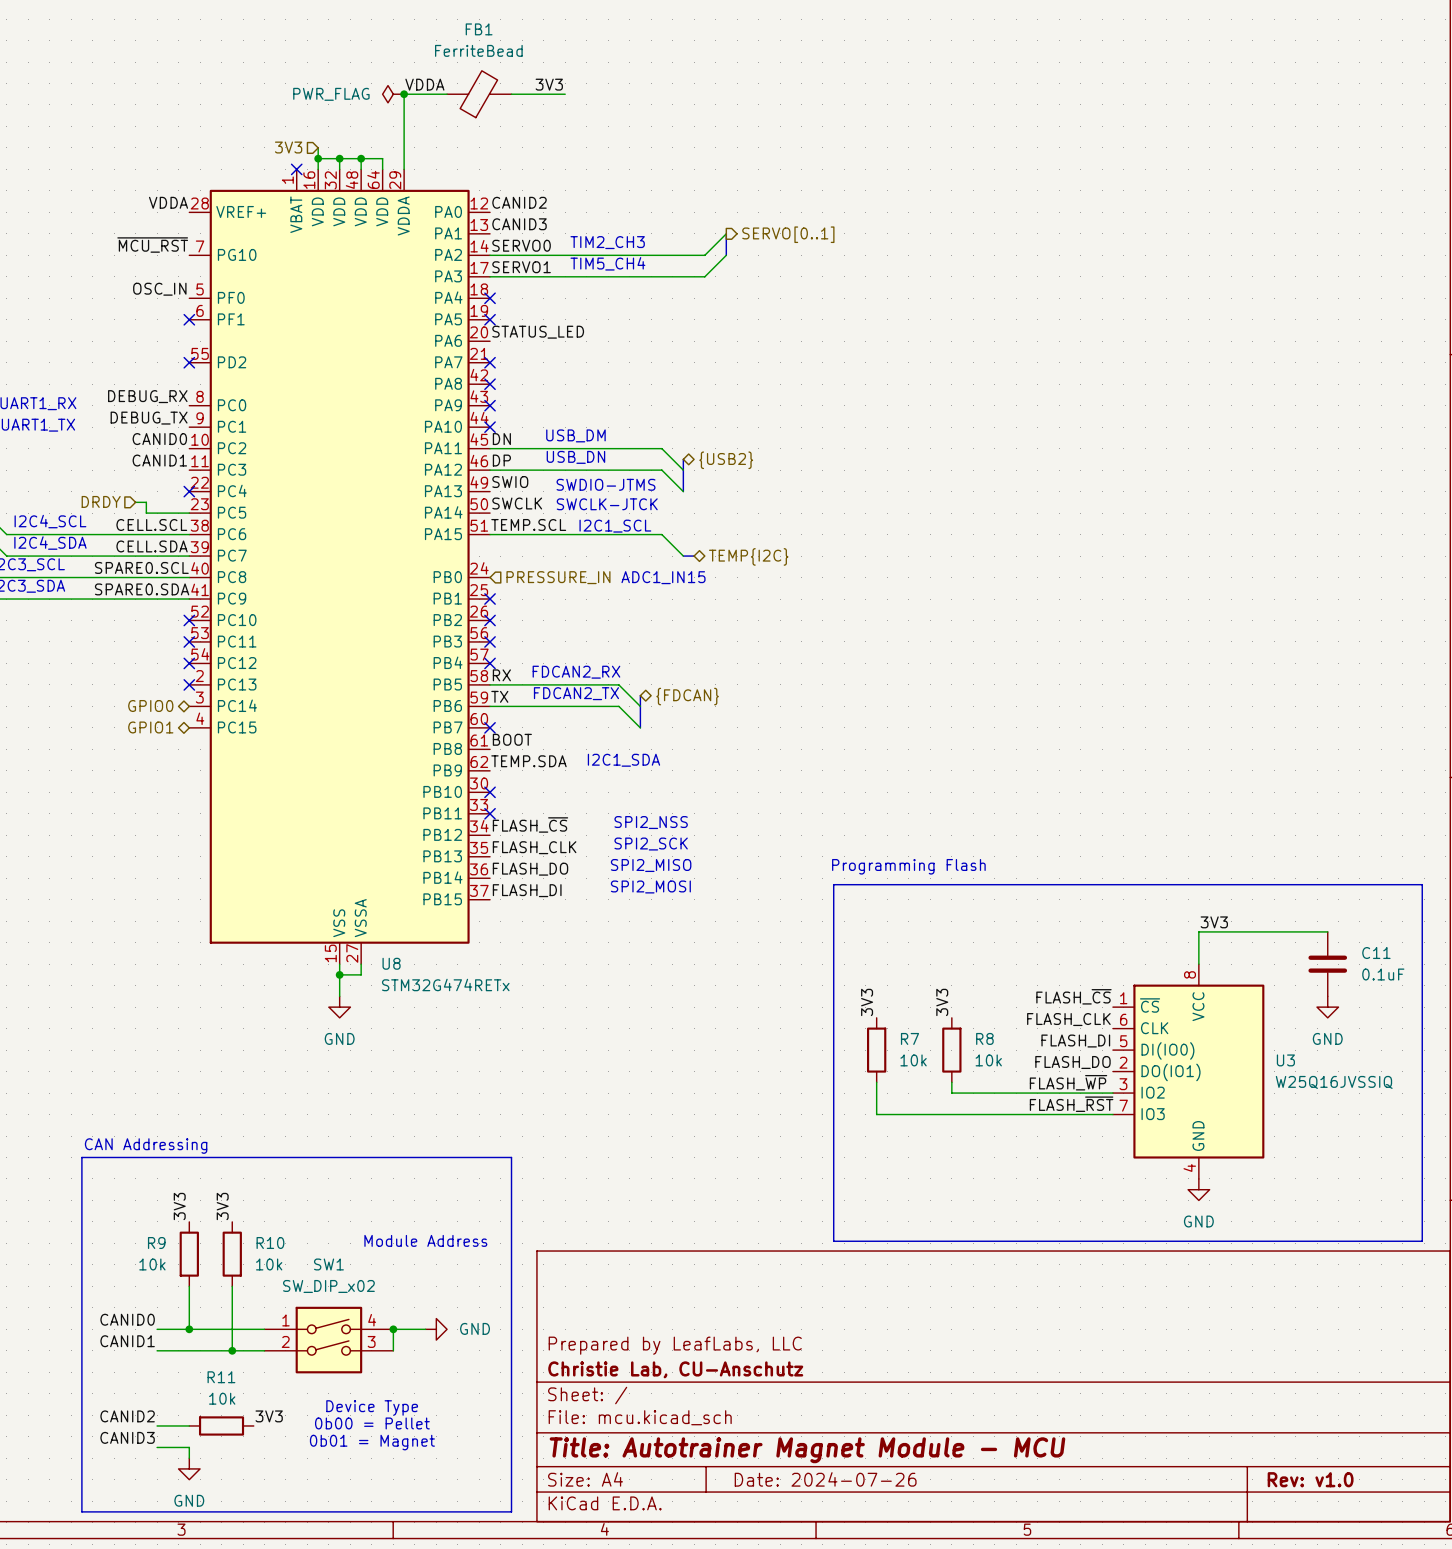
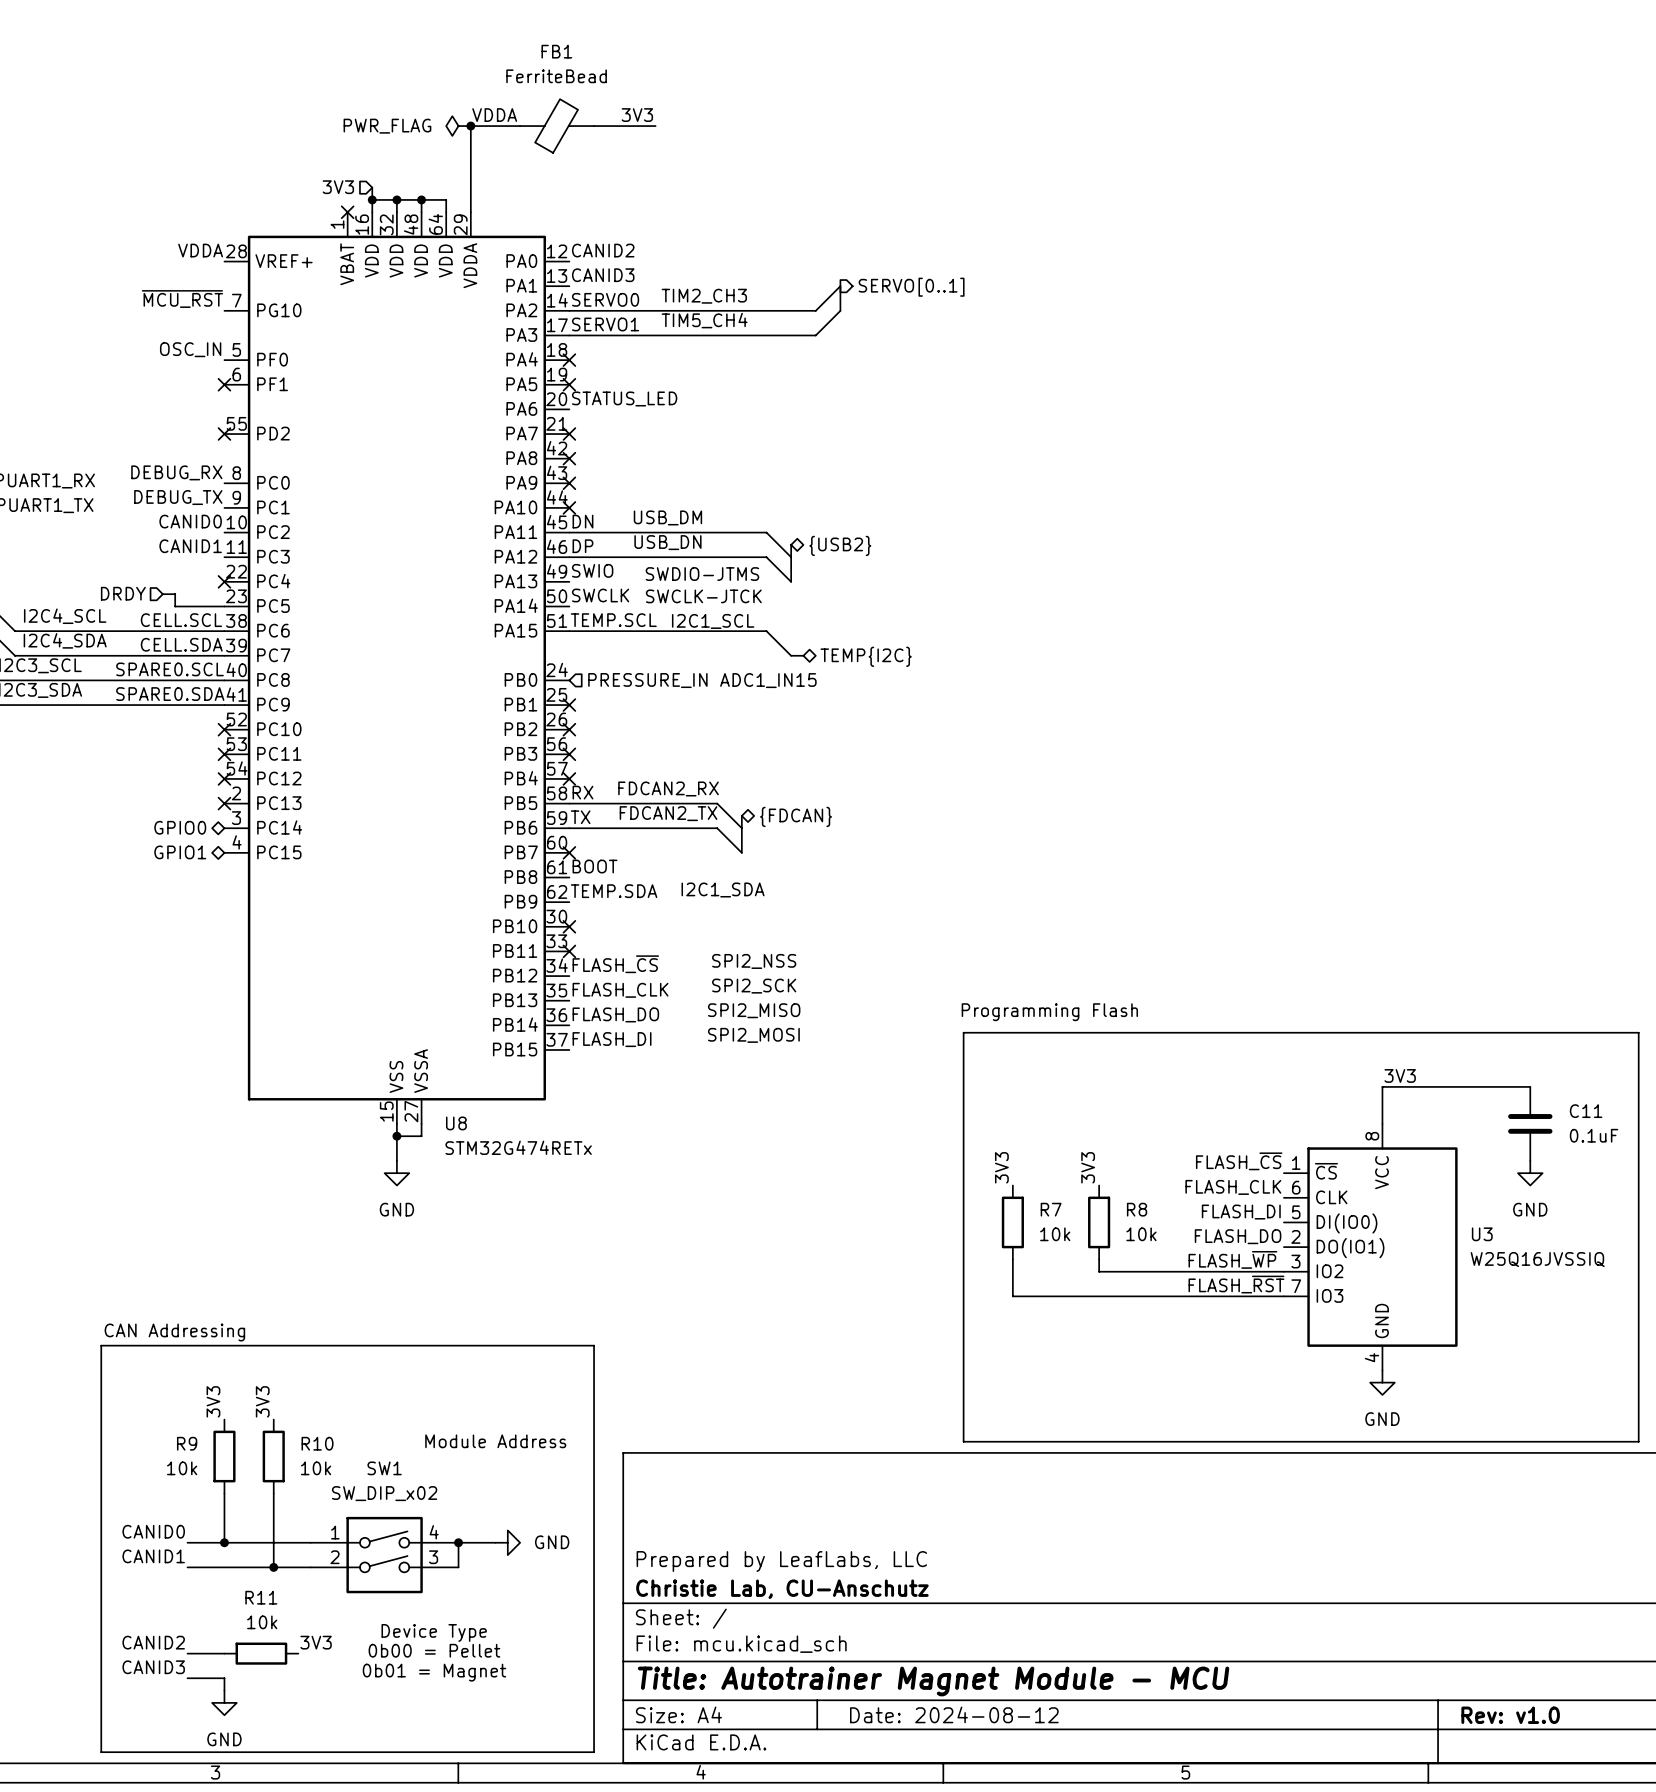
title block: Date: 2024-07-26 (825, 1479) -> Date: 2024-08-12 (954, 1714)

